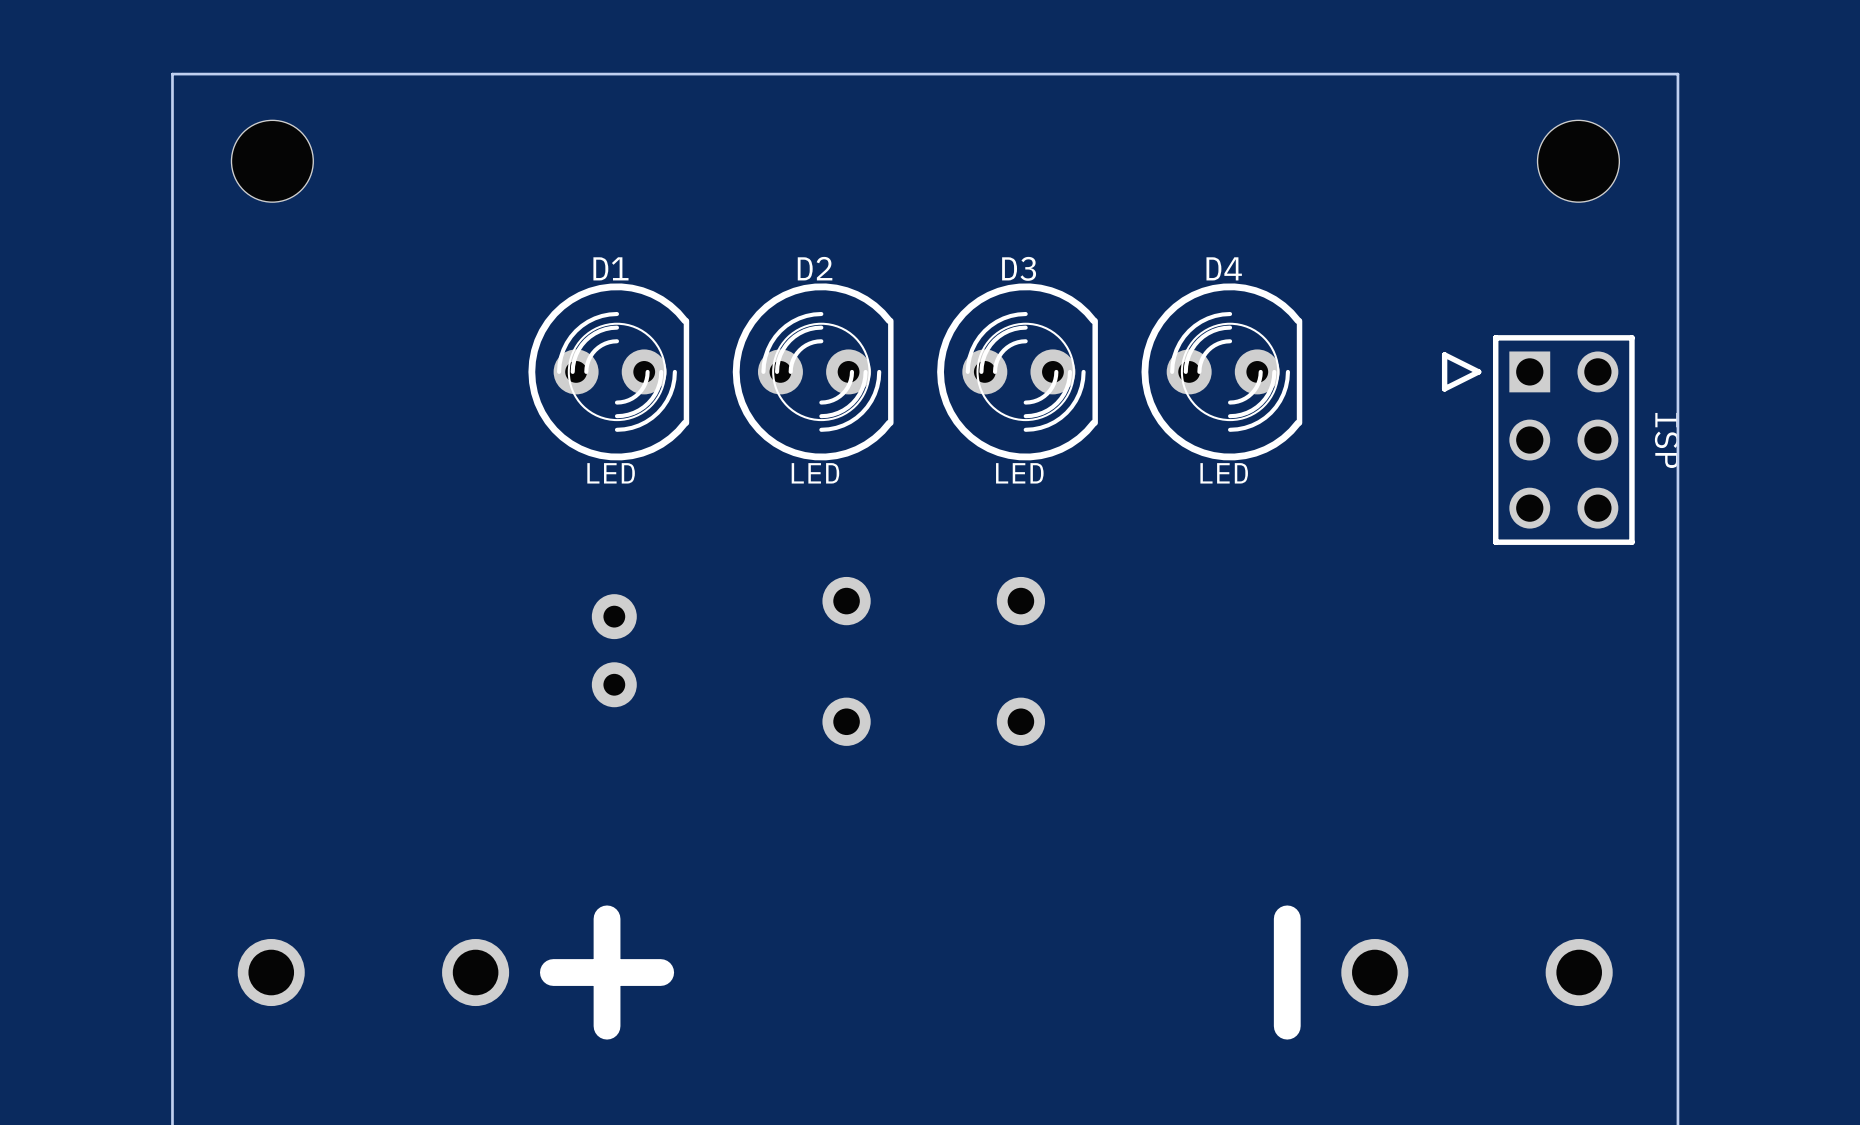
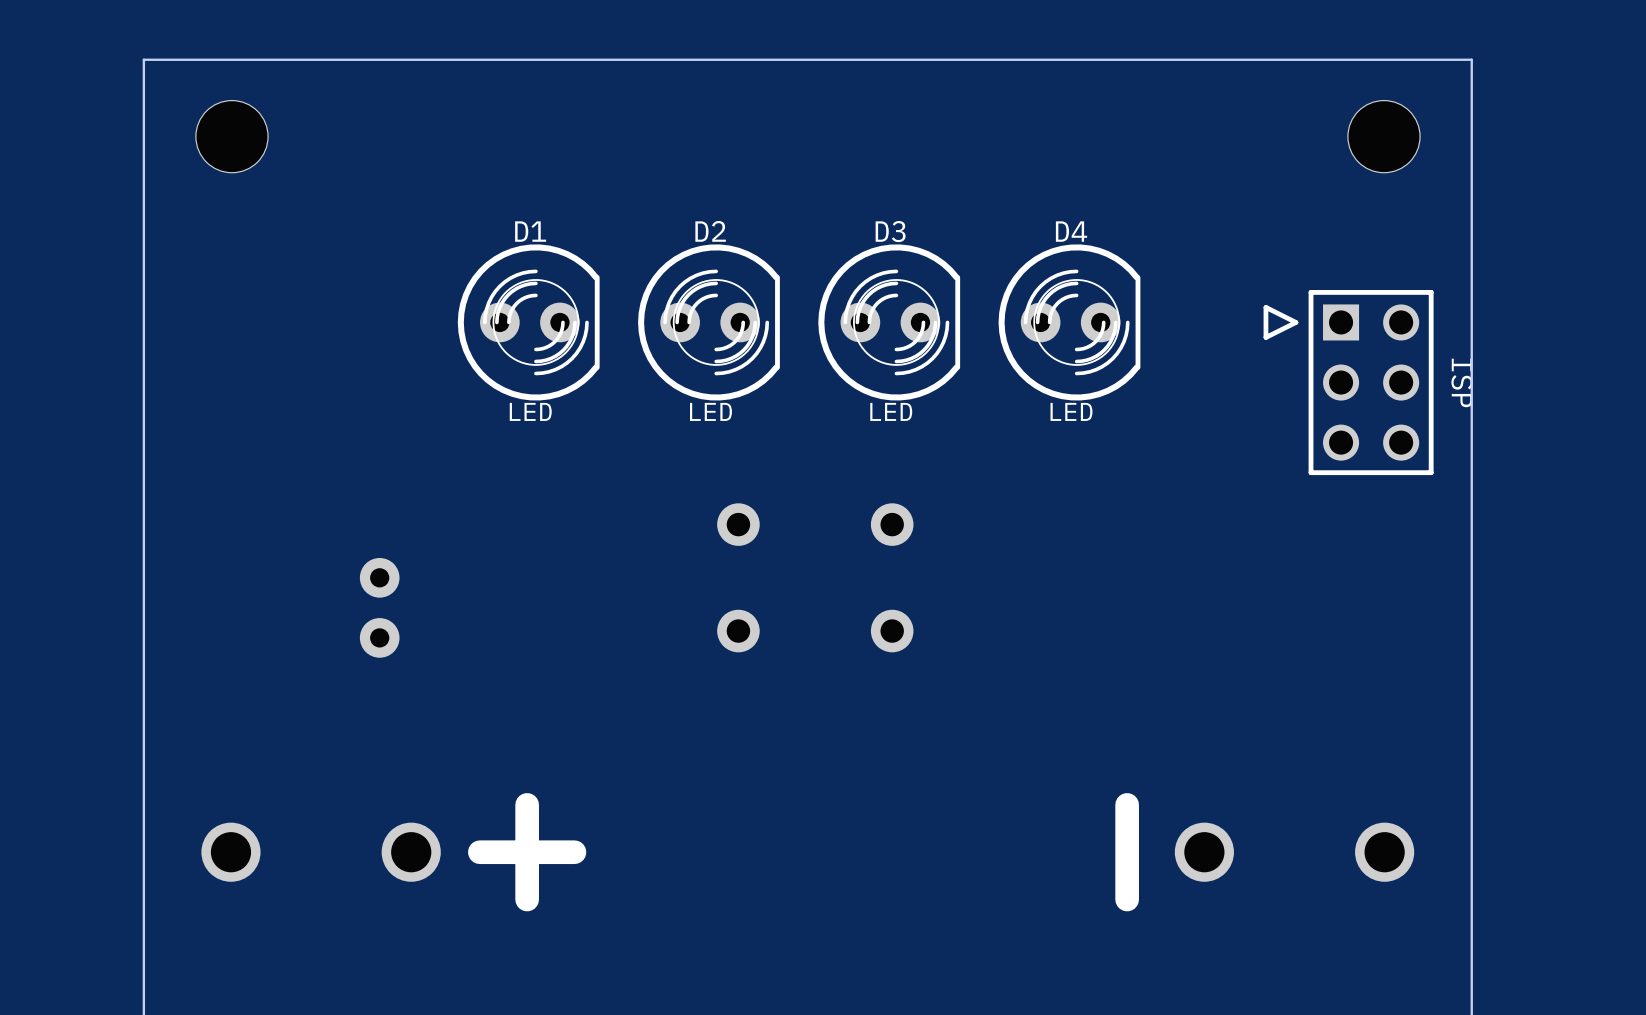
part position: (614, 650) -> (379, 607)

